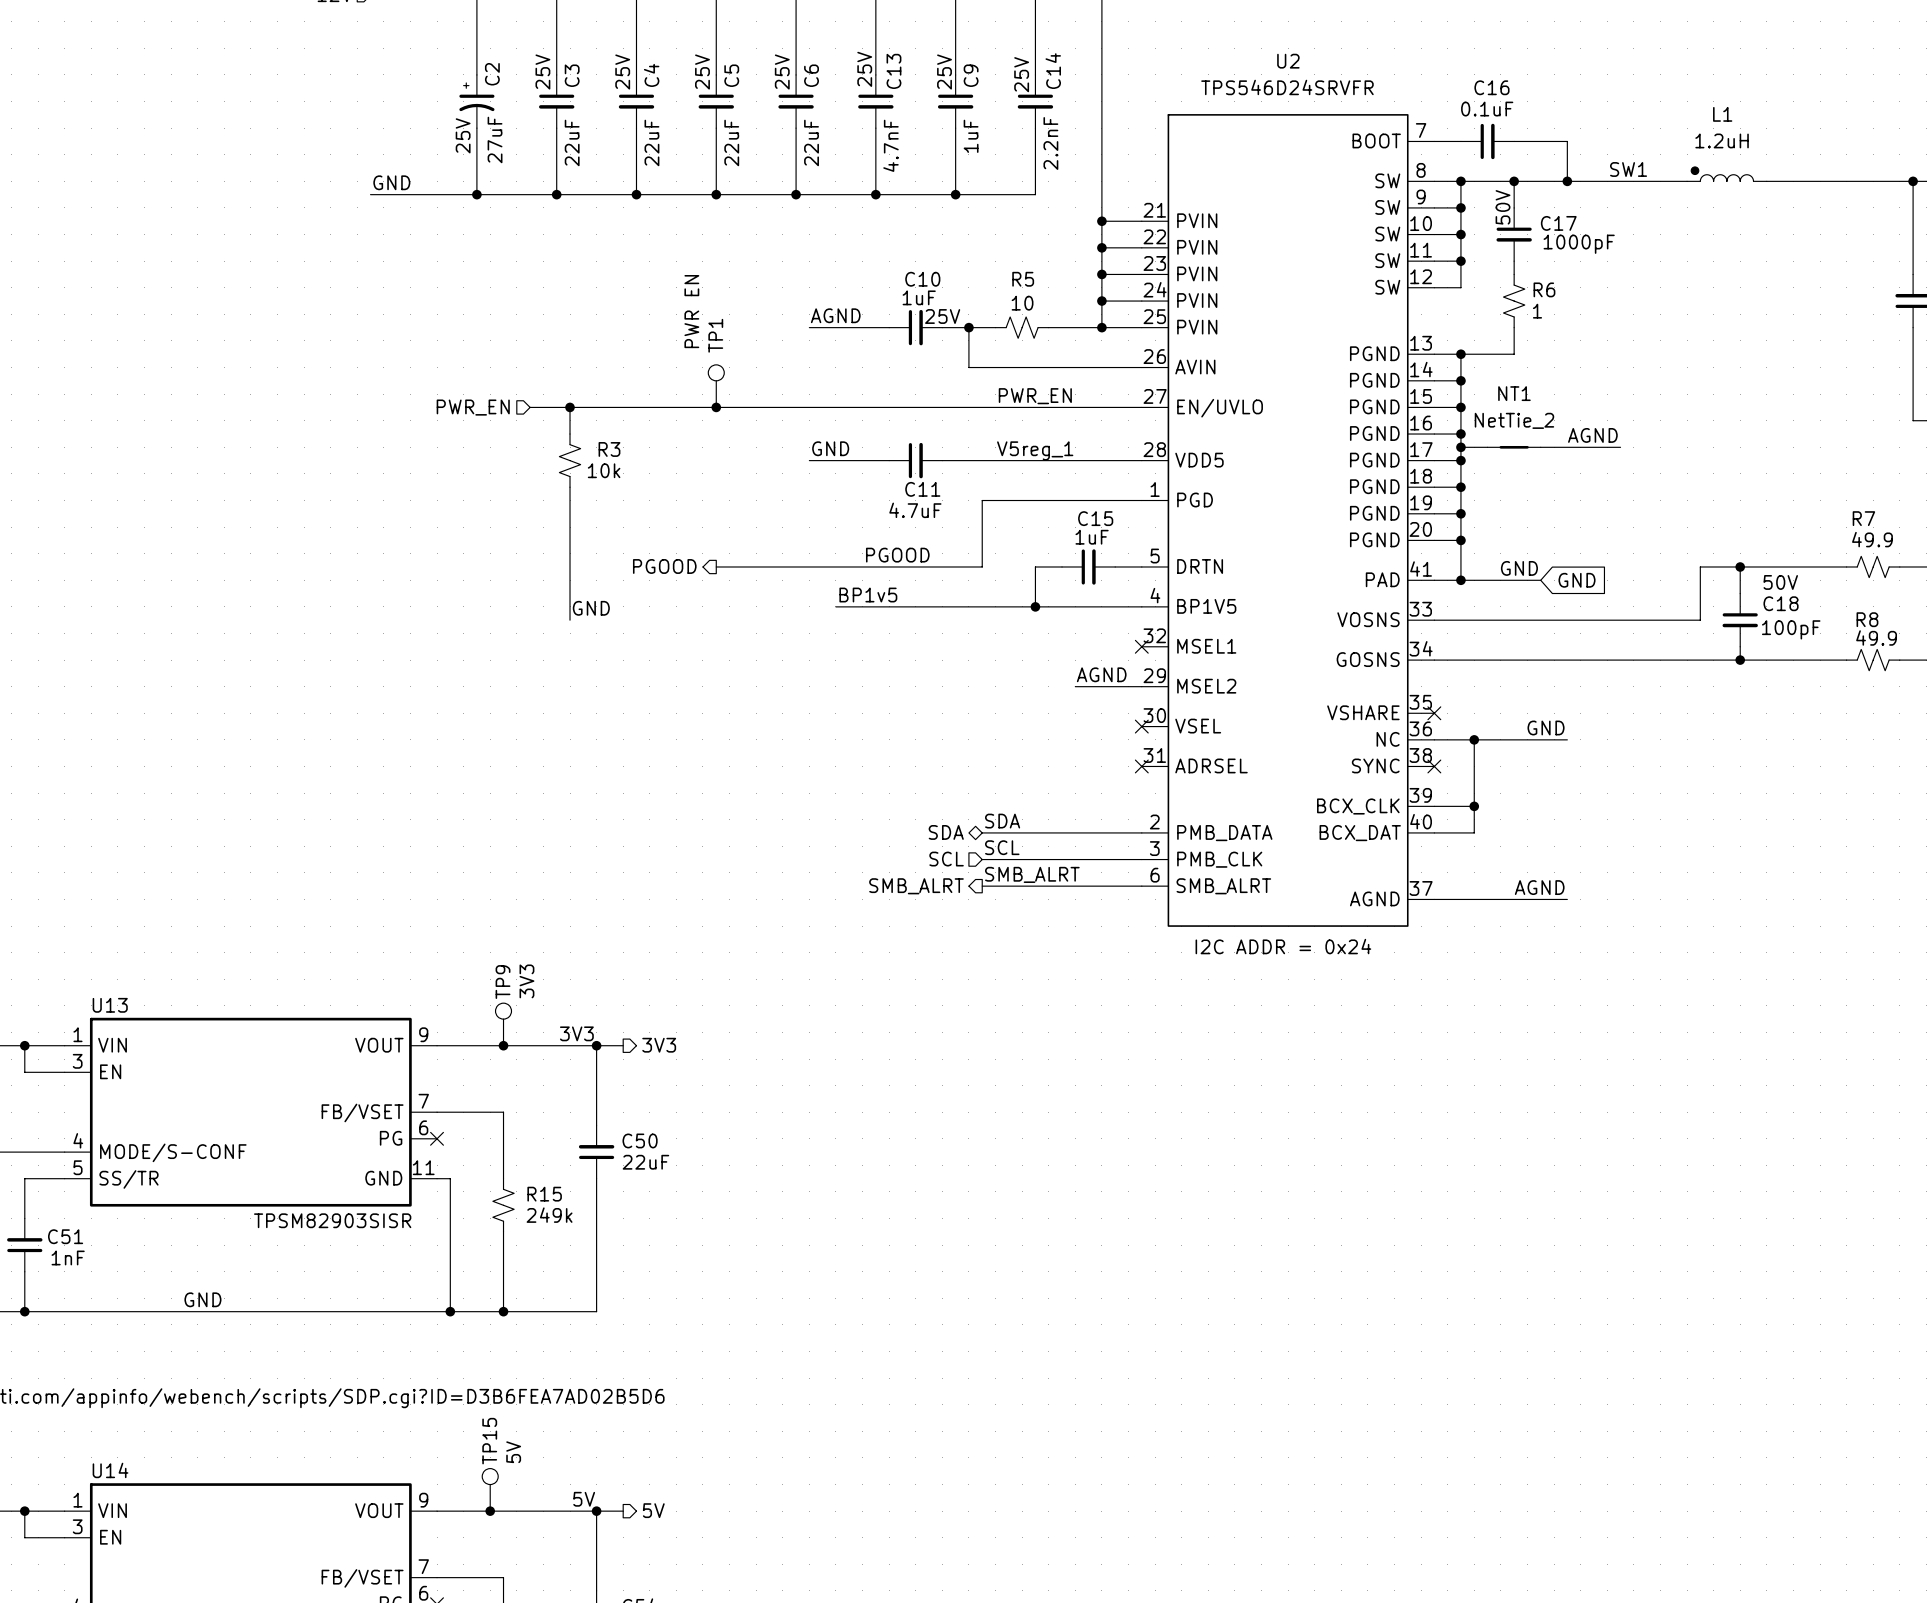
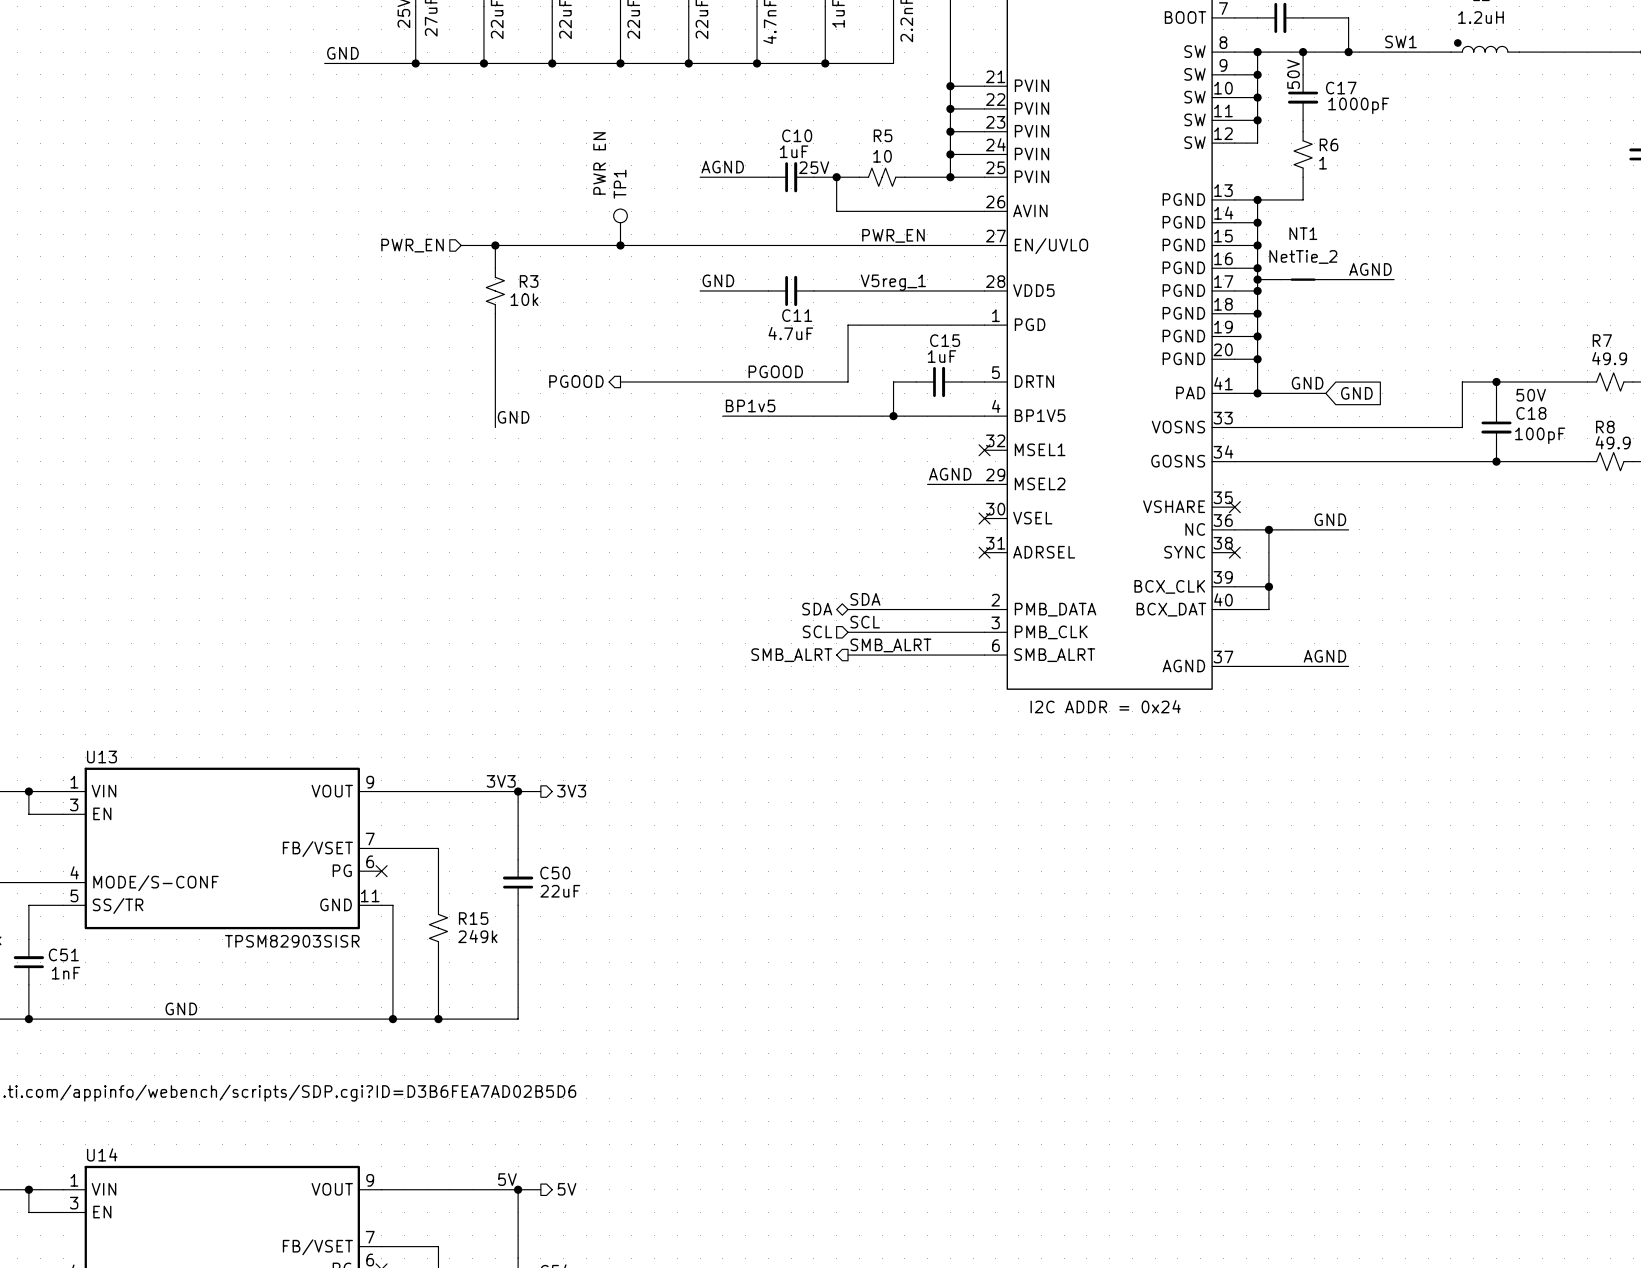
TP9: 3V3 (503, 1024) -> none
junction: (503, 1045) -> none
TP15: 5V (490, 1489) -> none
junction: (490, 1511) -> none

